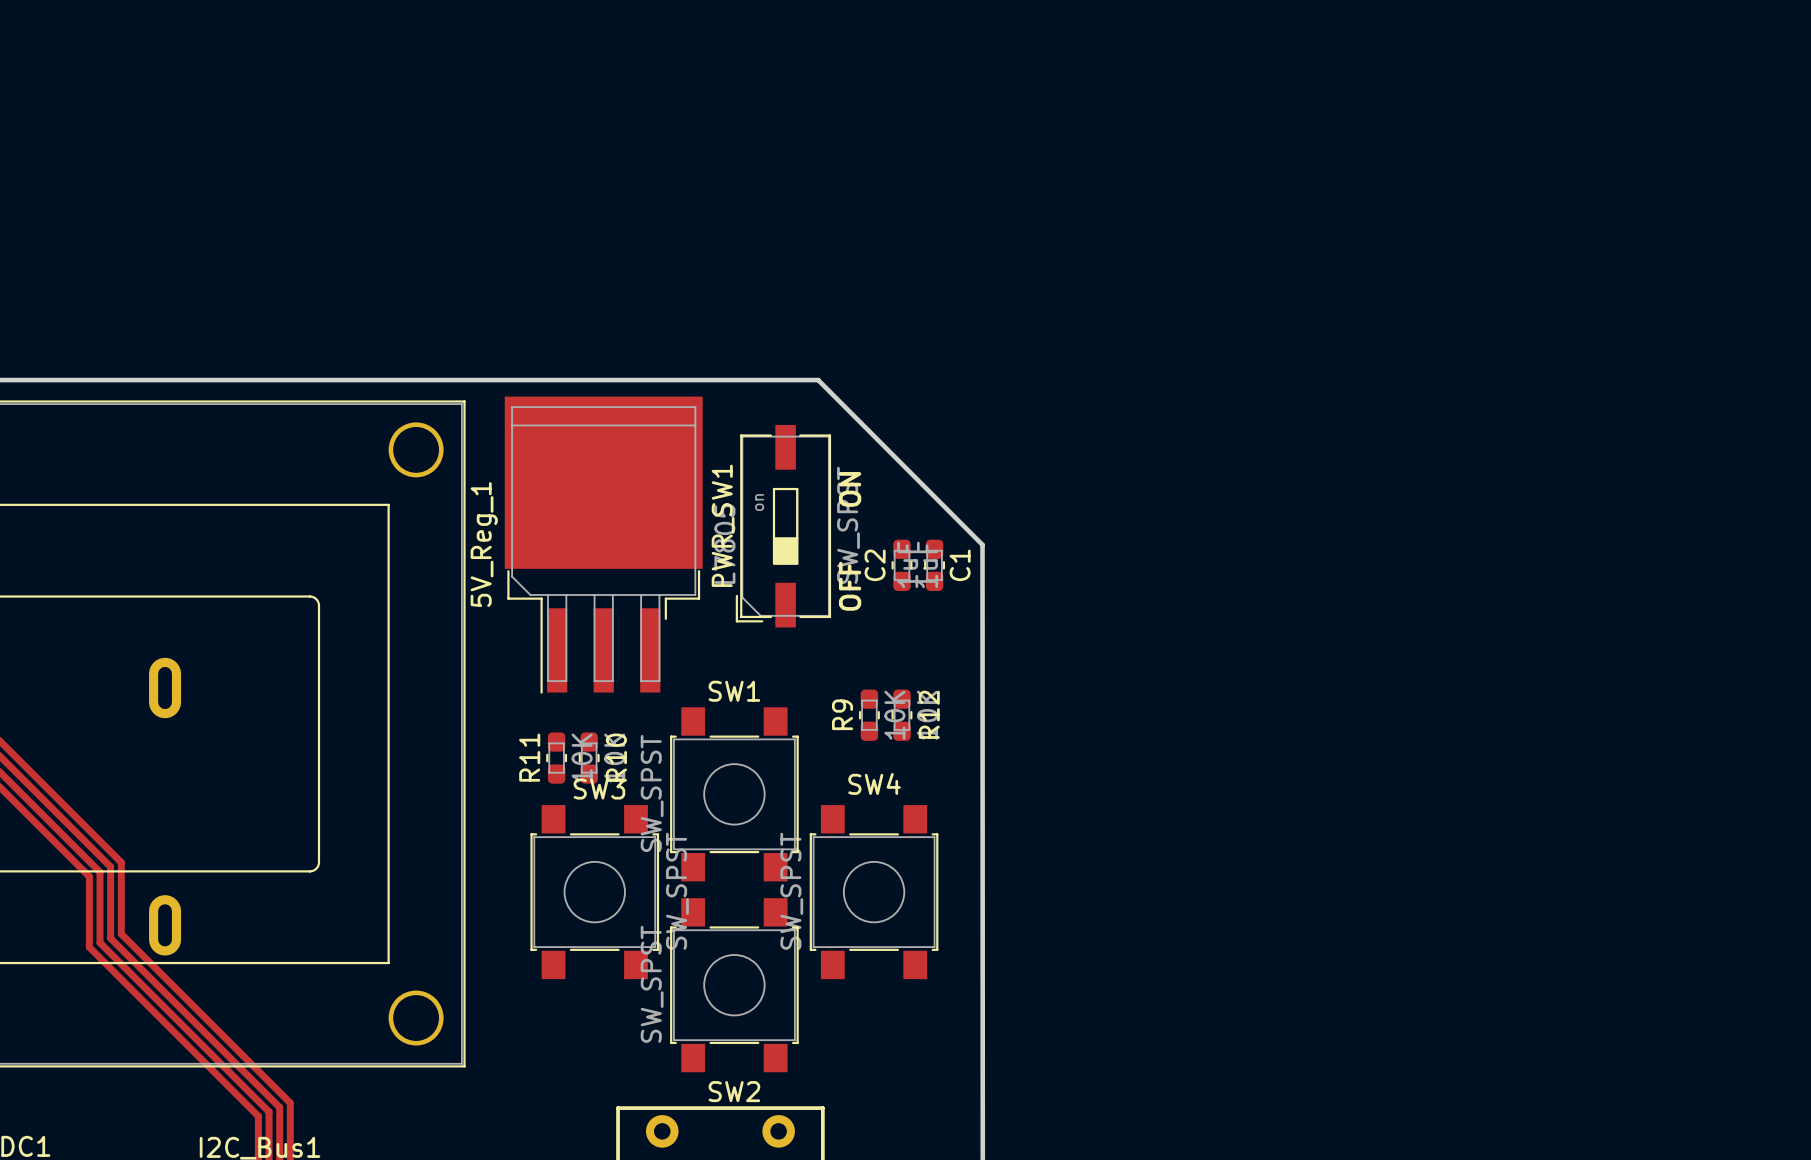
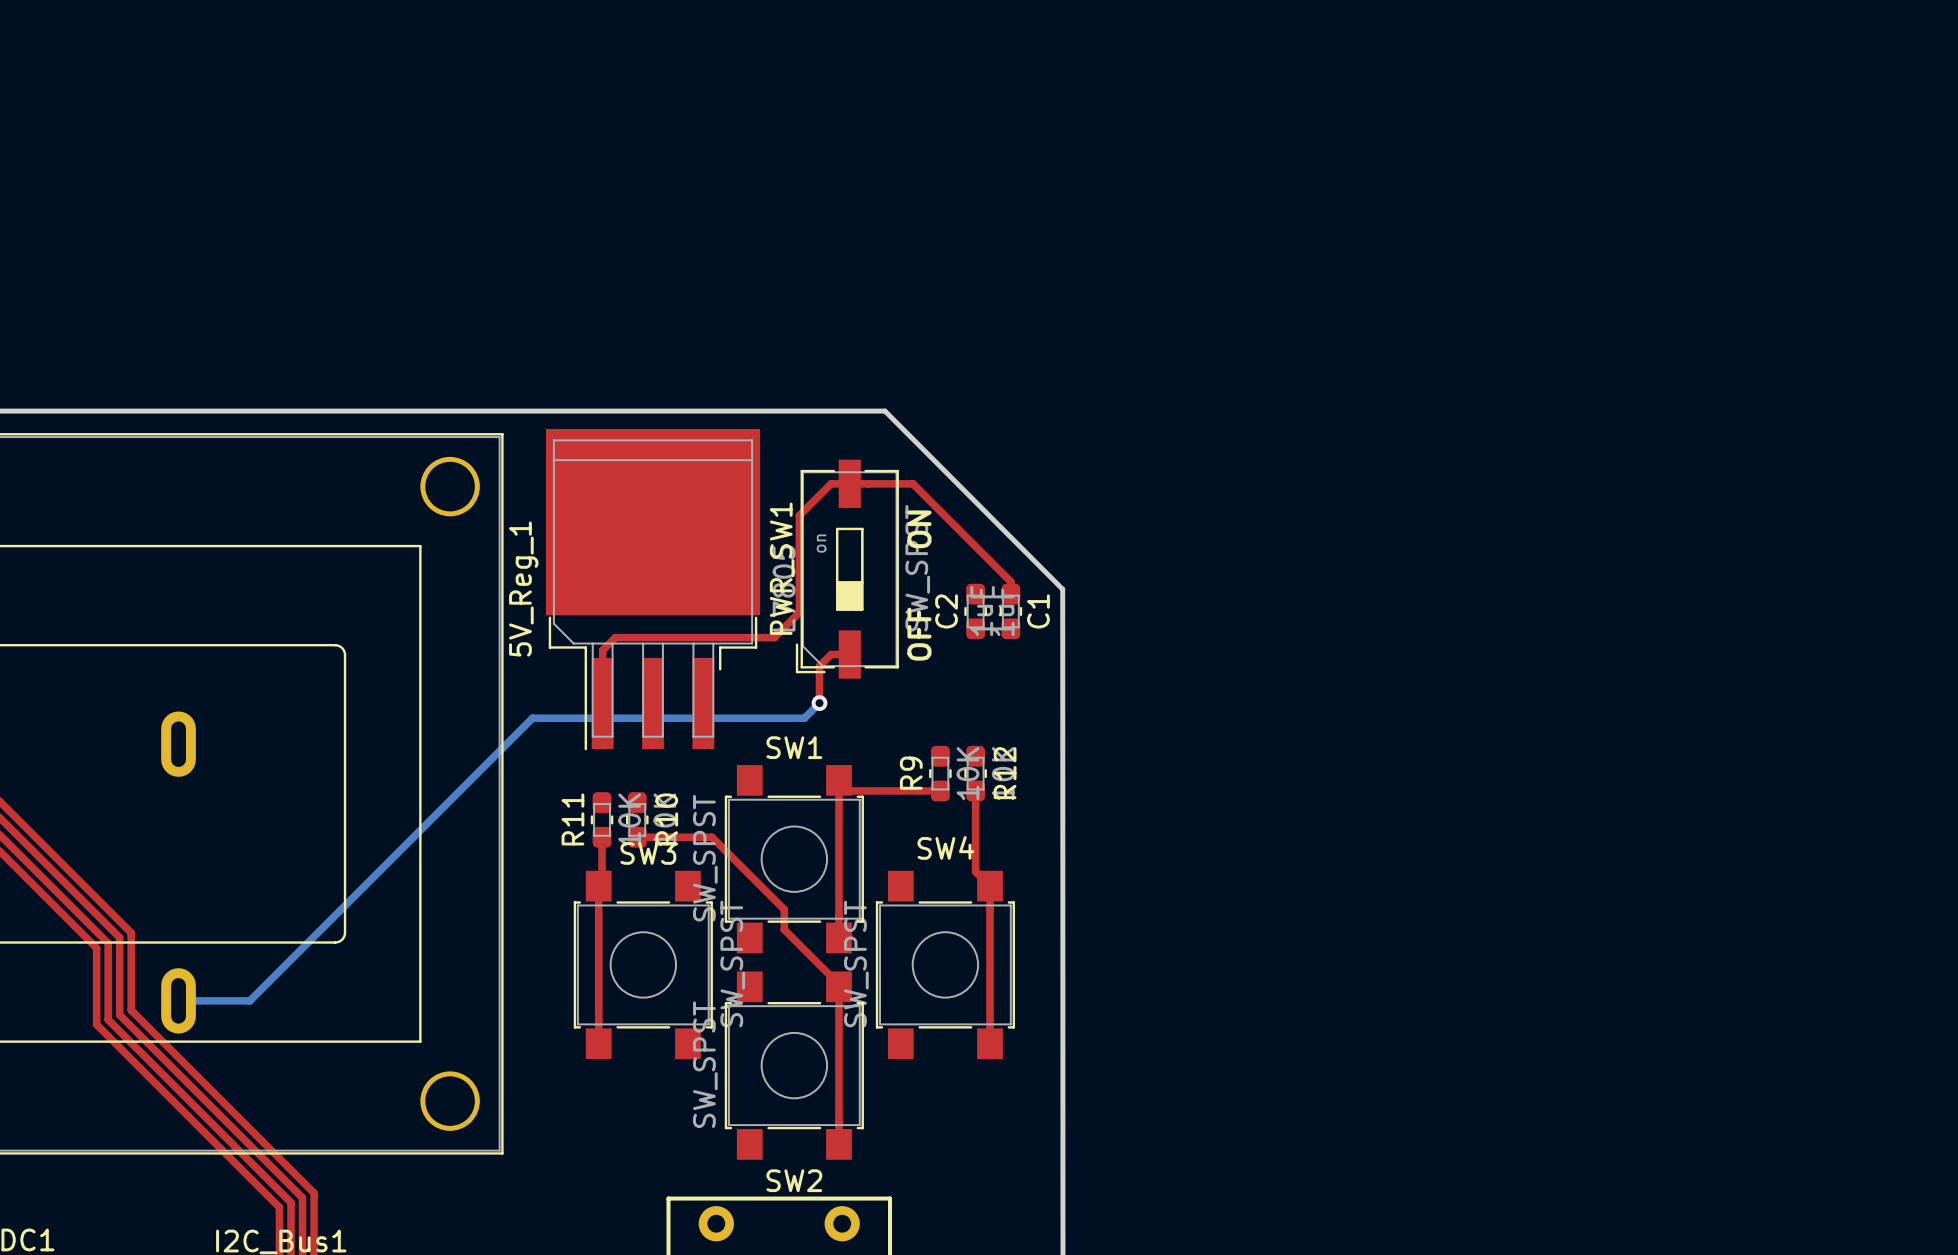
top track: none -> (1010, 594) (1010, 581) (912, 483) (831, 483) (799, 515) (799, 612) (774, 637) (615, 637) (602, 650) (602, 703)
top track: none -> (849, 654) (831, 654) (819, 666) (819, 703)
bottom track: none -> (819, 703) (804, 718) (532, 718) (249, 1000) (178, 1000)
via: none -> (819, 703)
top track: none -> (940, 790) (849, 790) (838, 780) (838, 937)
top track: none -> (975, 790) (975, 871) (990, 886) (990, 1043)
top track: none -> (602, 837) (602, 882) (598, 886) (598, 1043)
top track: none -> (637, 837) (712, 837) (784, 909) (784, 929) (838, 984) (838, 1144)

